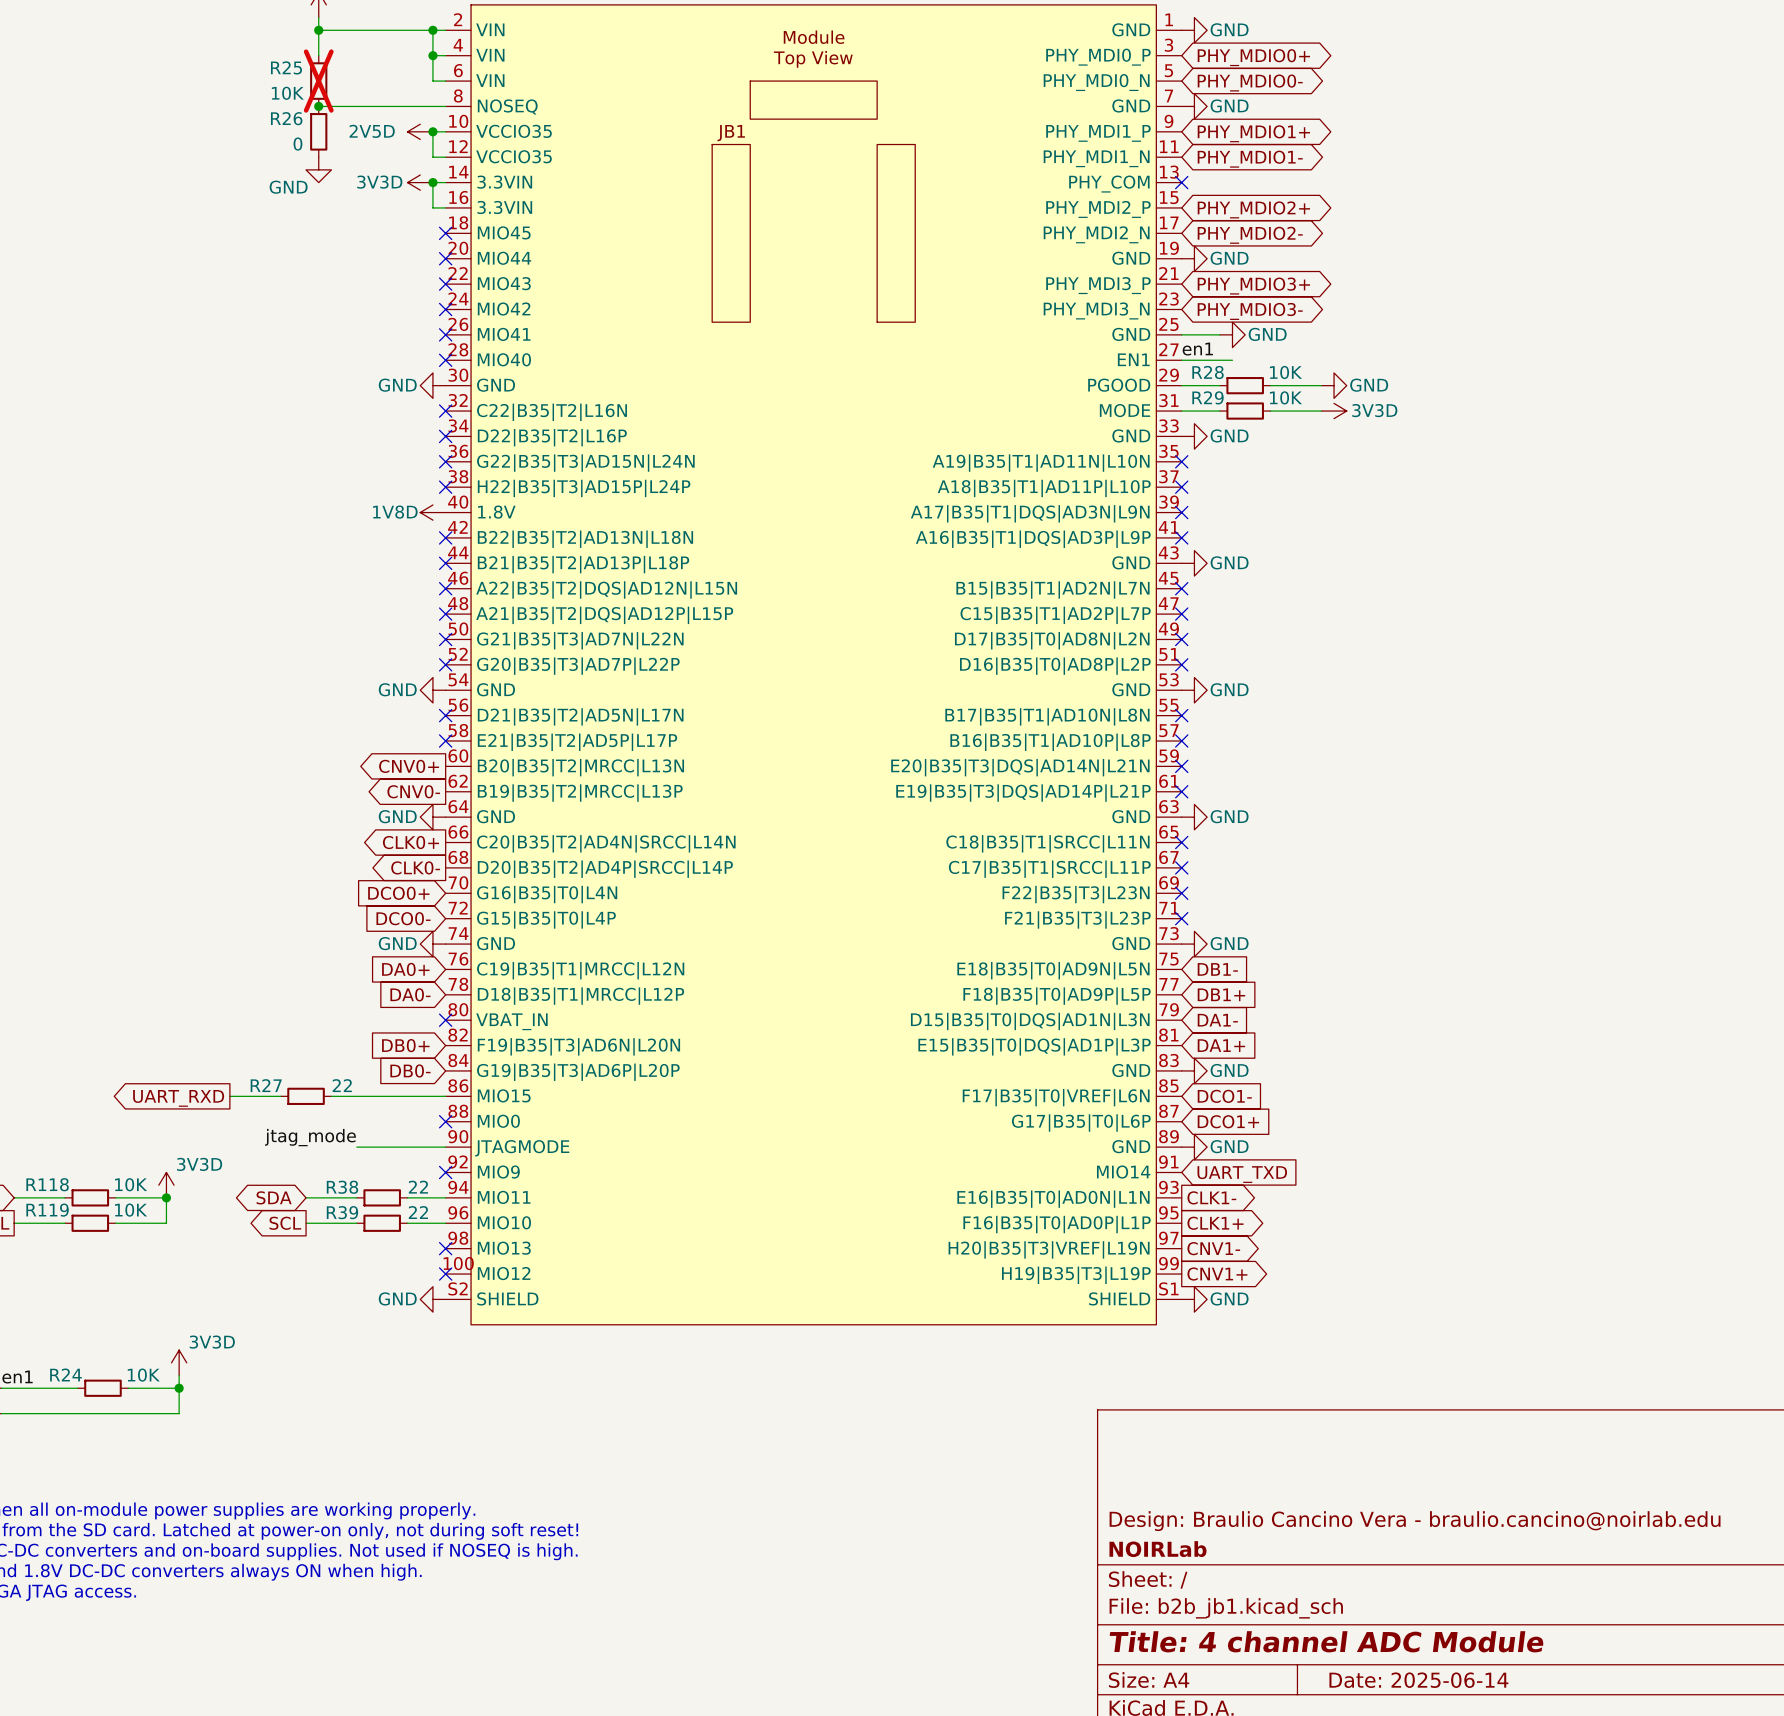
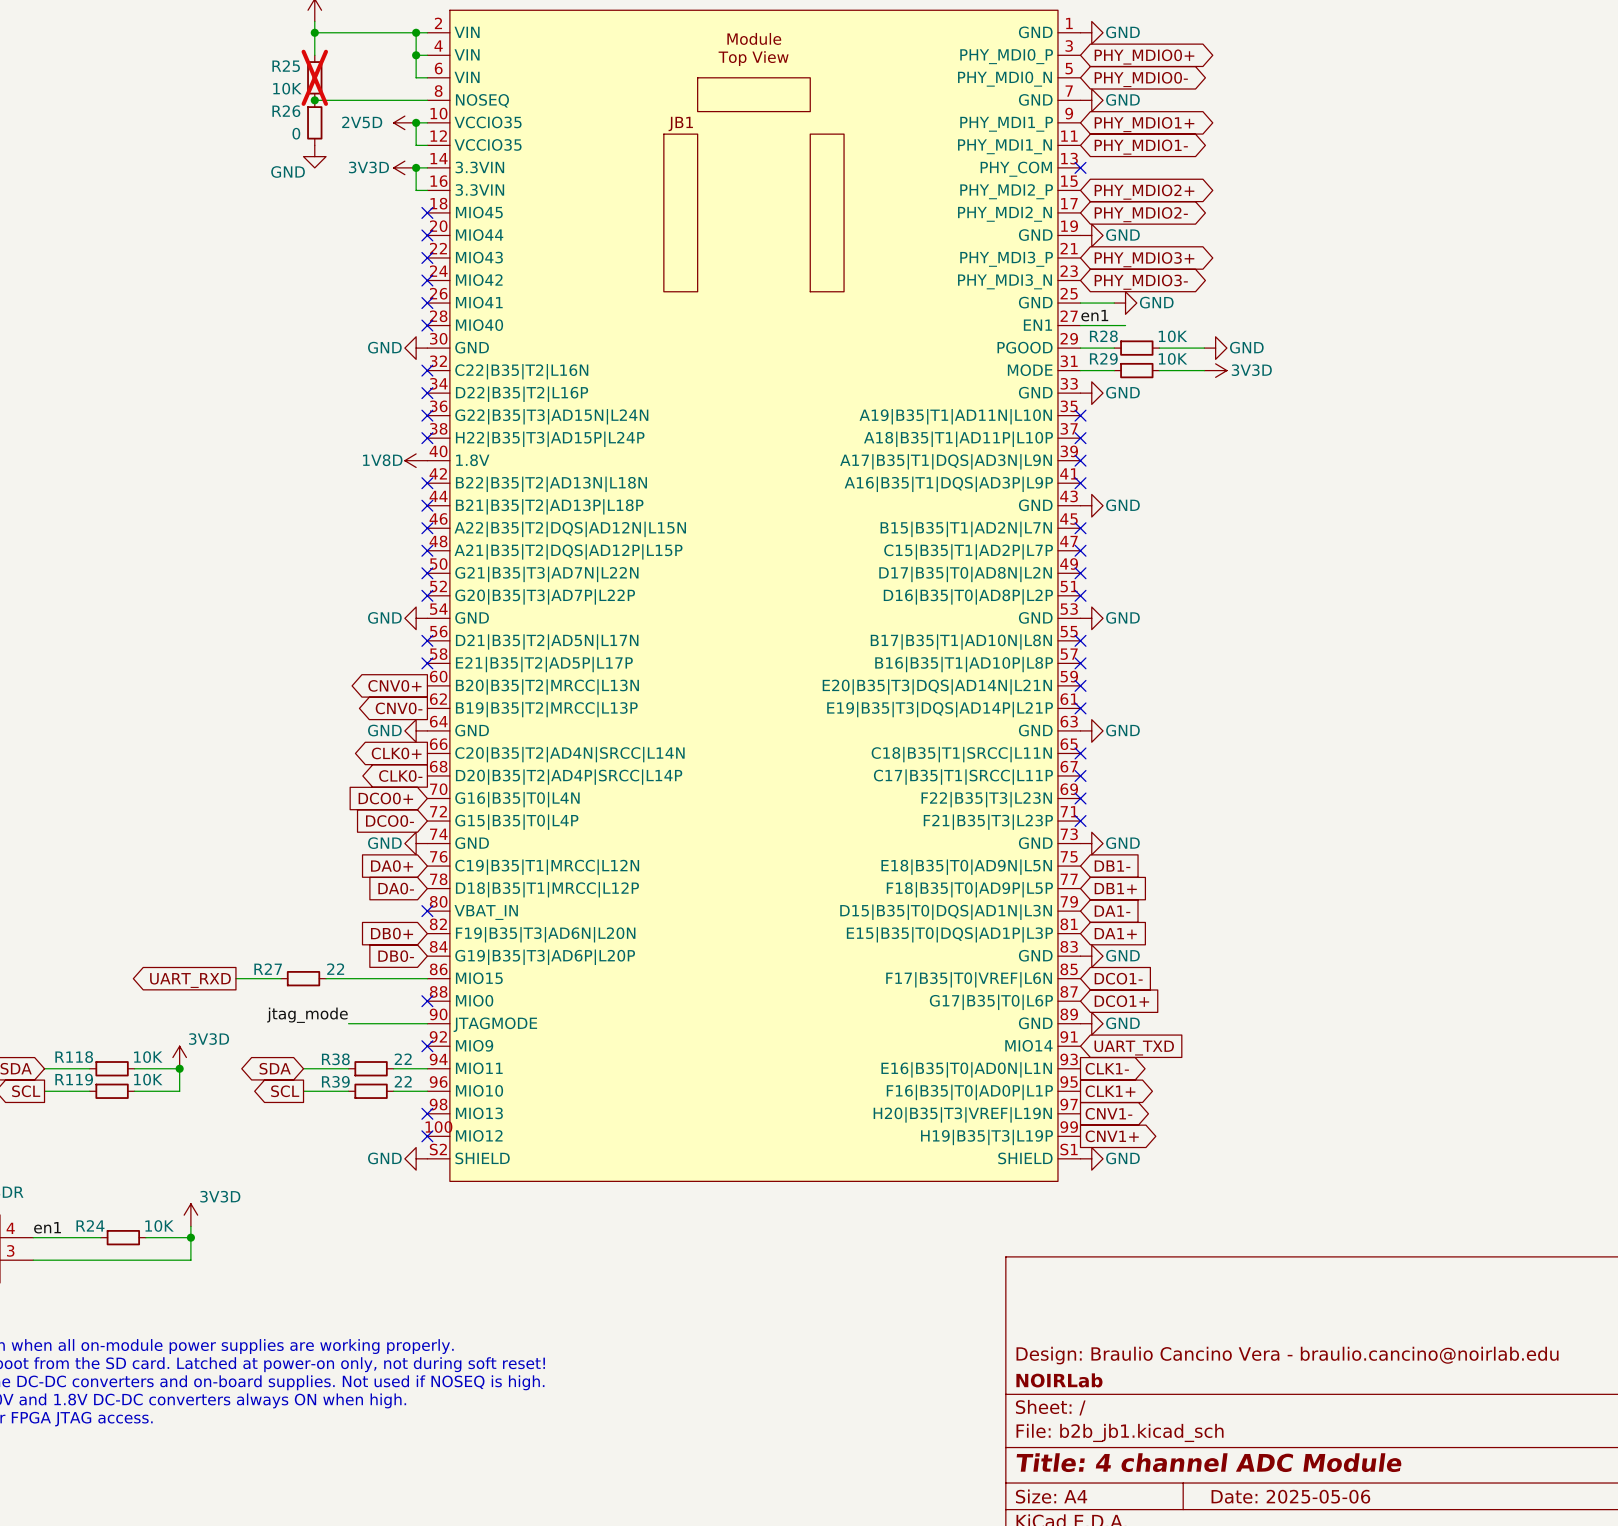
title block: Date: 2025-06-14 (1418, 1680) -> Date: 2025-05-06 (1290, 1496)

